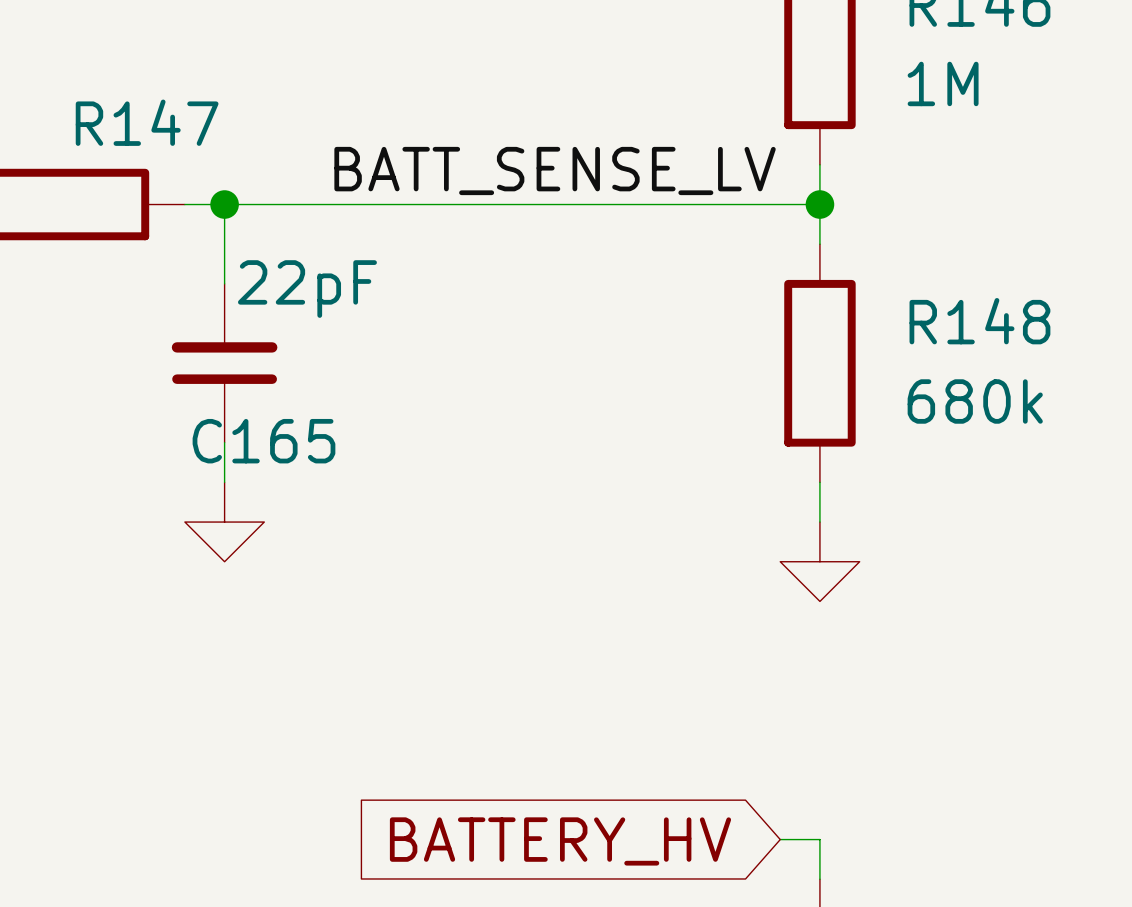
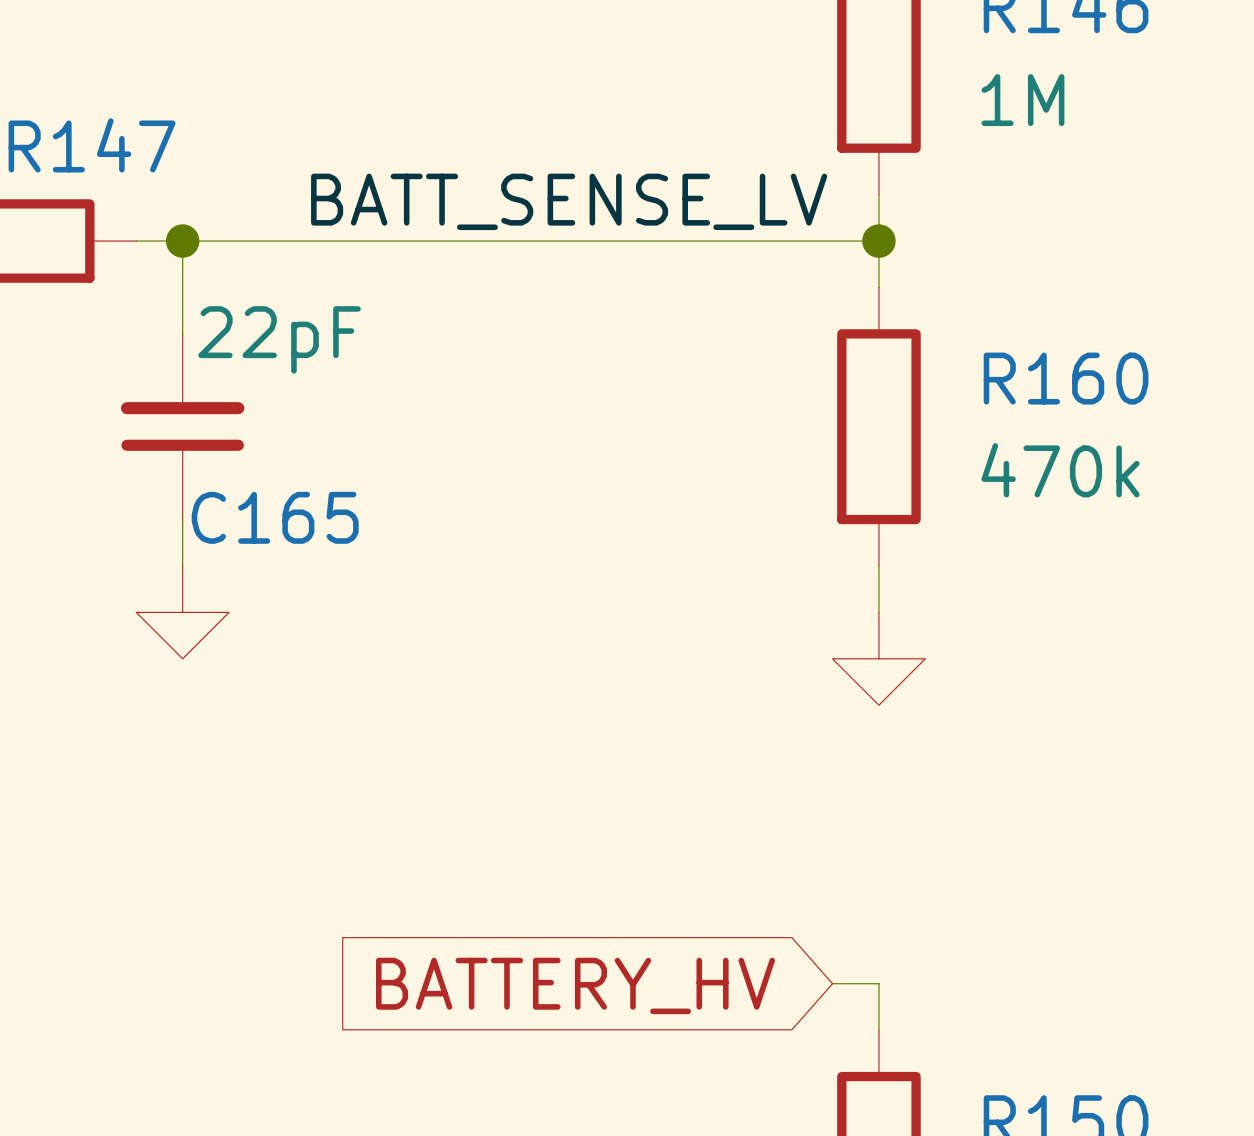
R148 name: R148 (979, 321) -> R160 (1066, 378)
R148 value: 680k (975, 401) -> 470k (1060, 470)
C165 name position: C165 (263, 441) -> C165 (275, 517)

